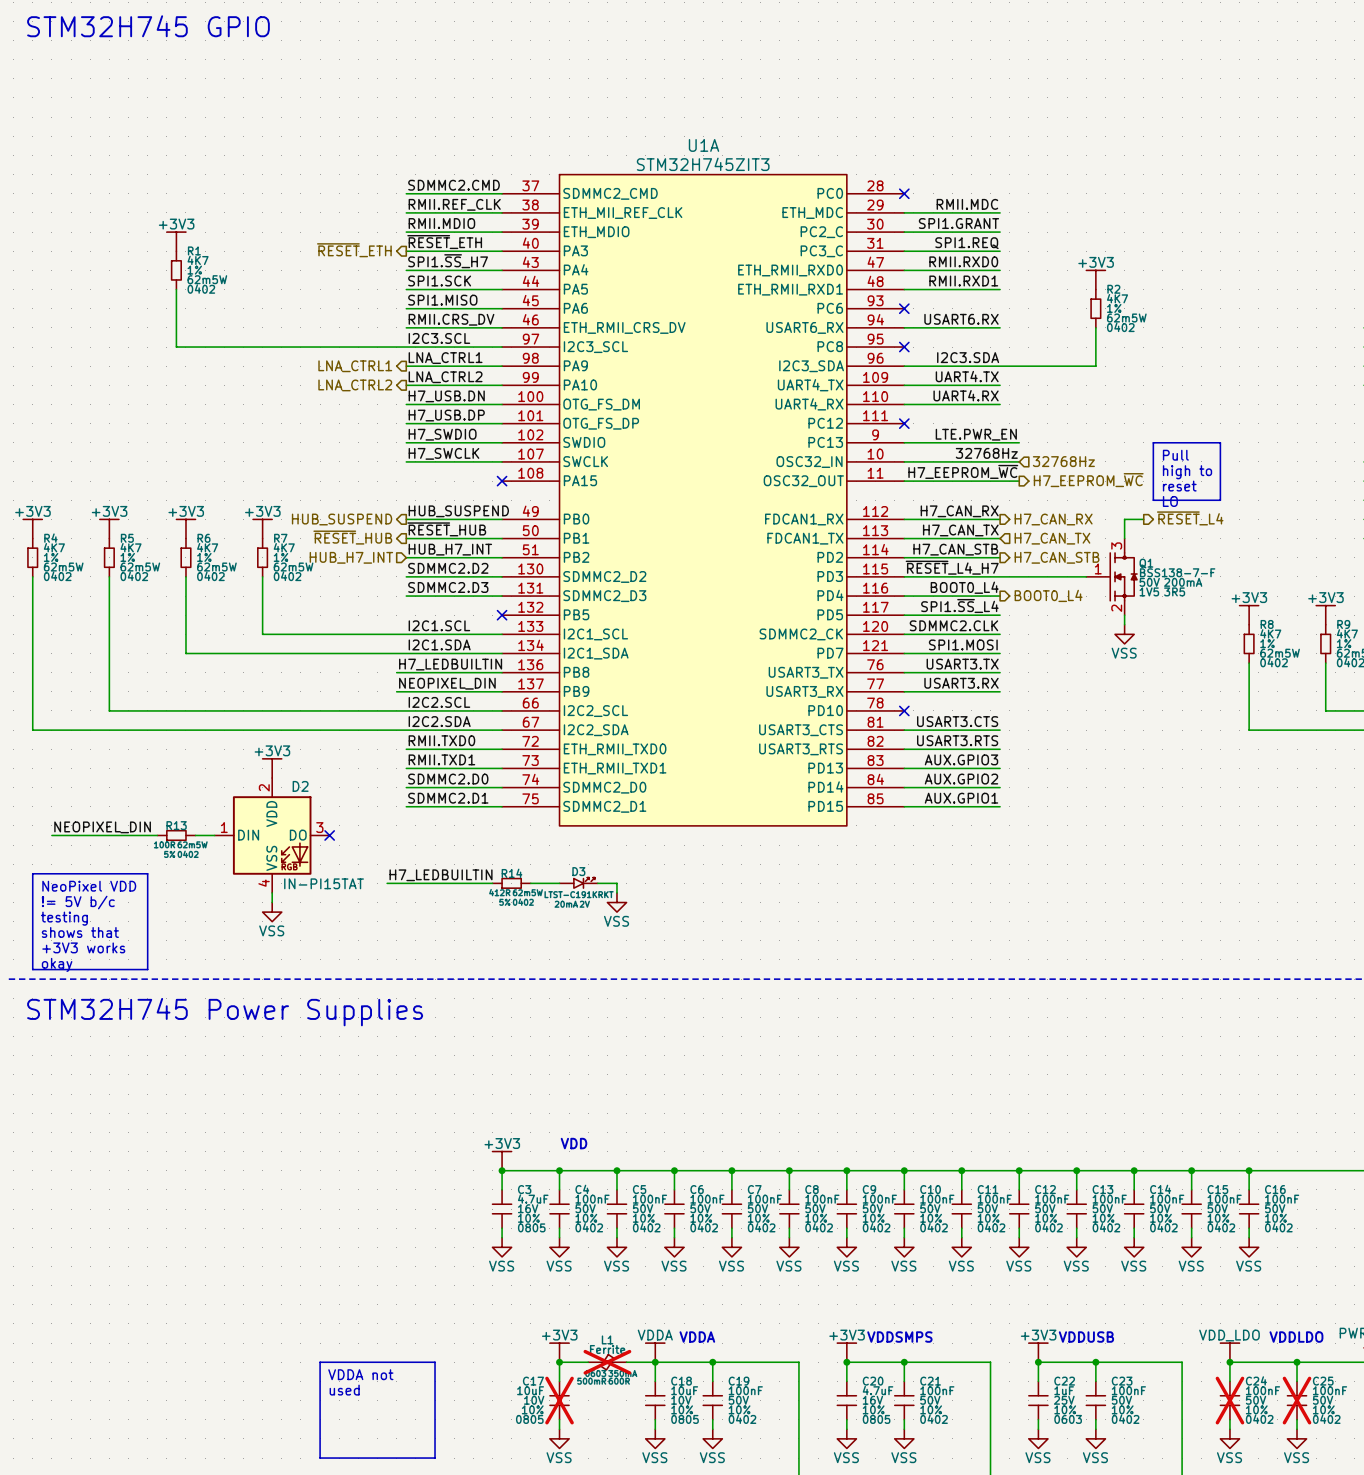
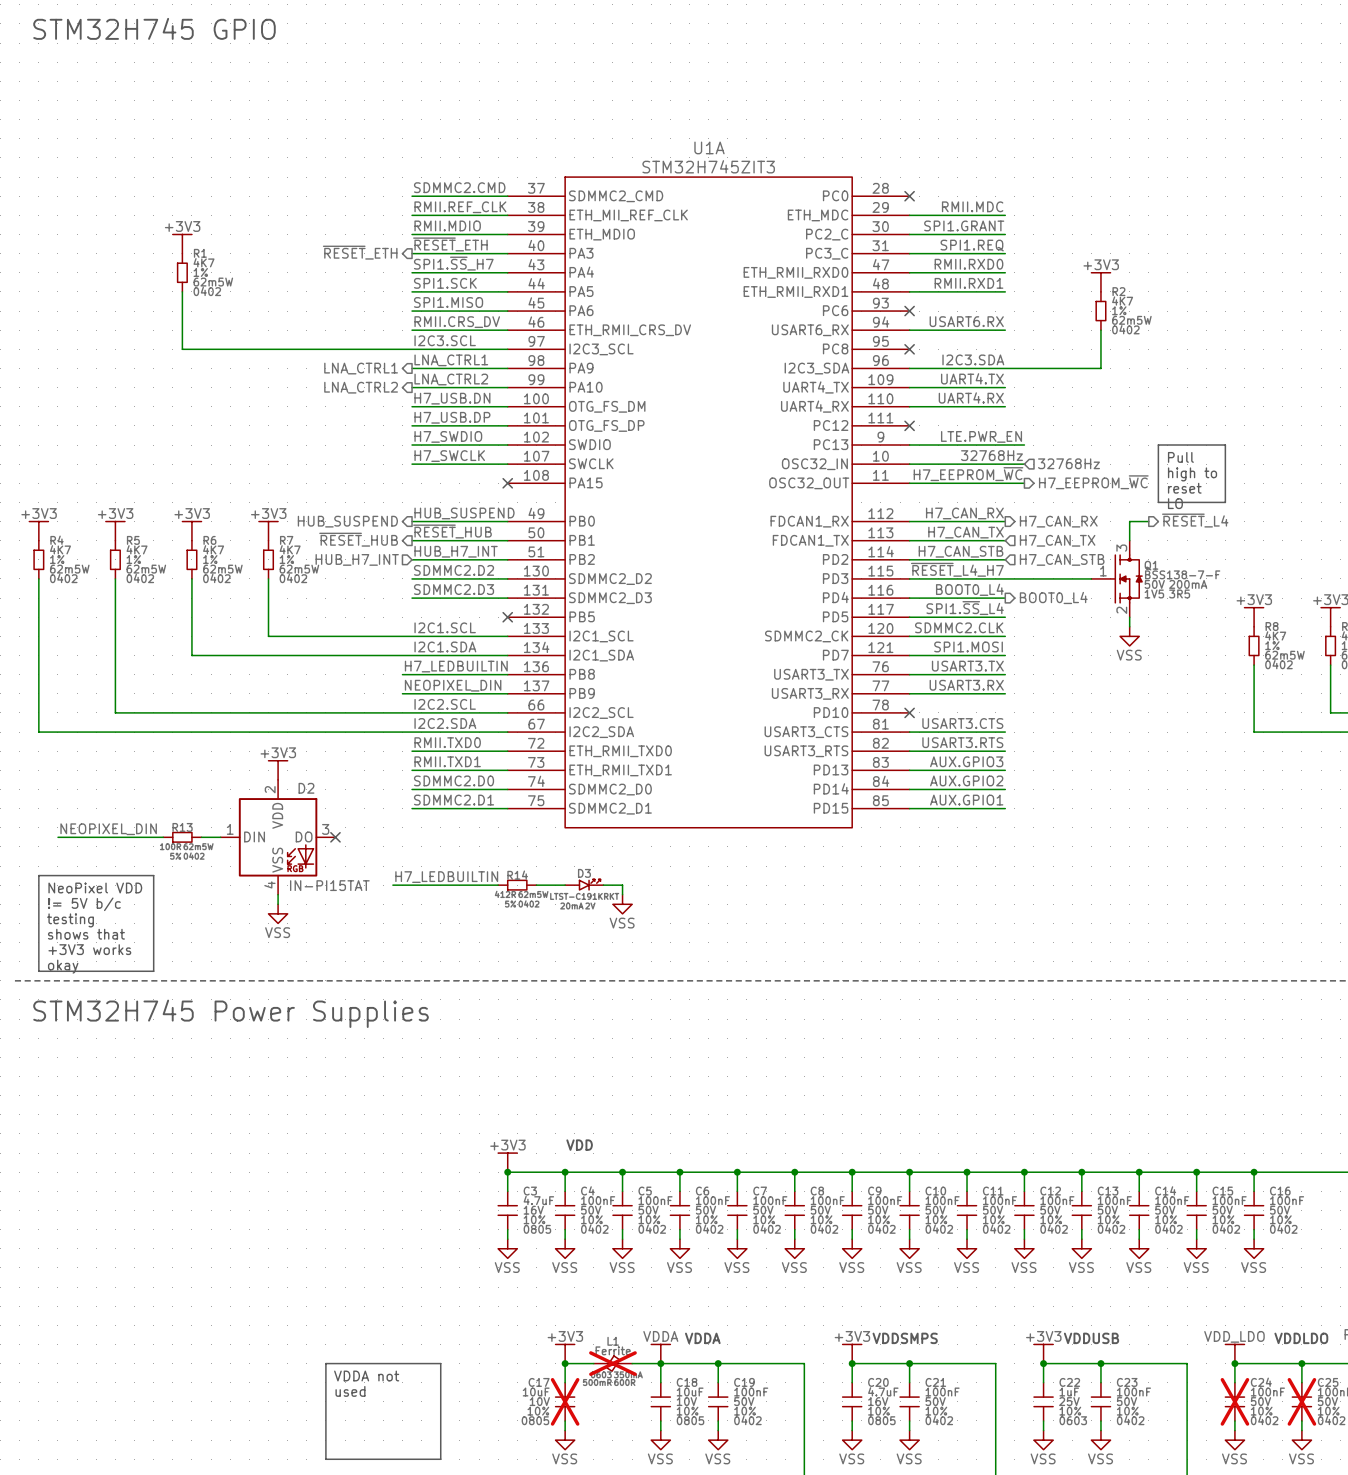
hierarchical label shape: output (1057, 557) -> input (1062, 559)

